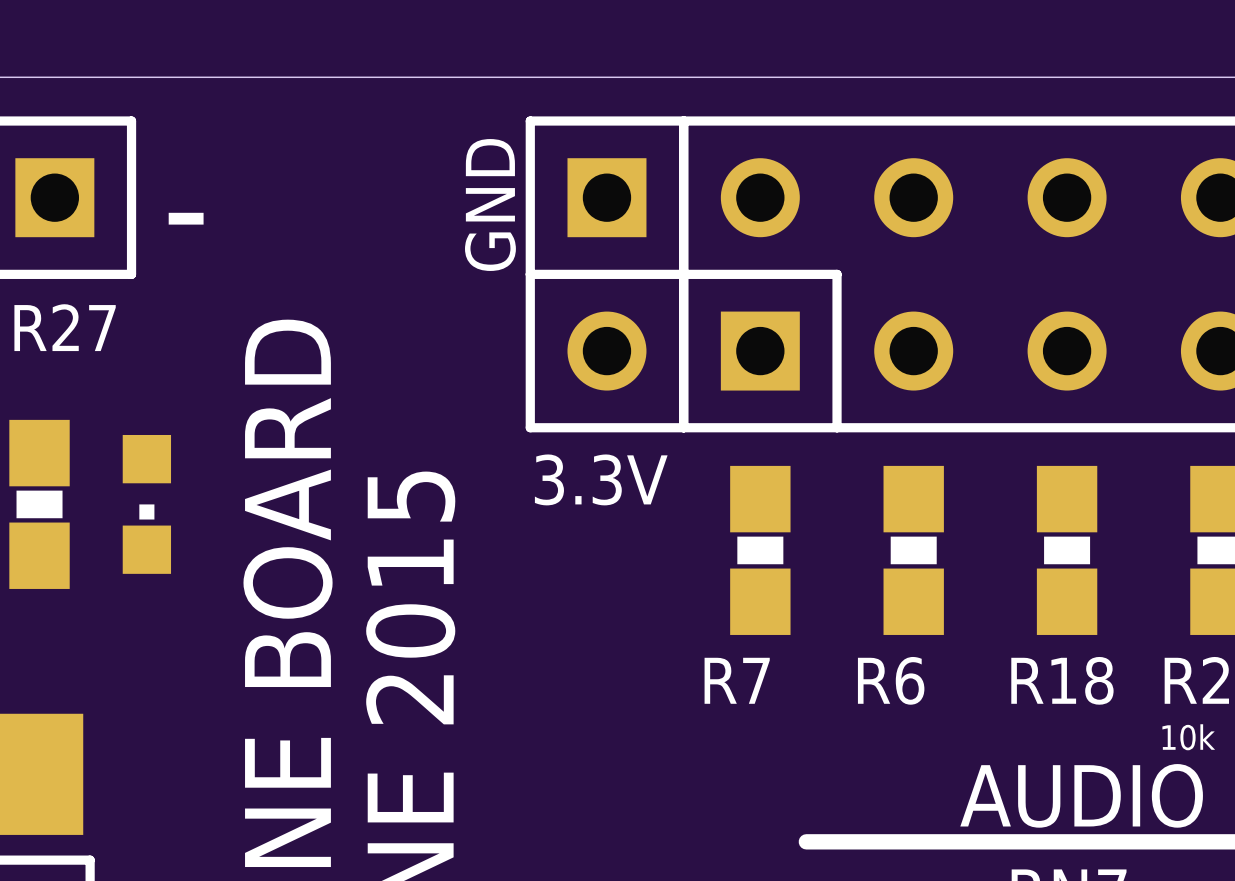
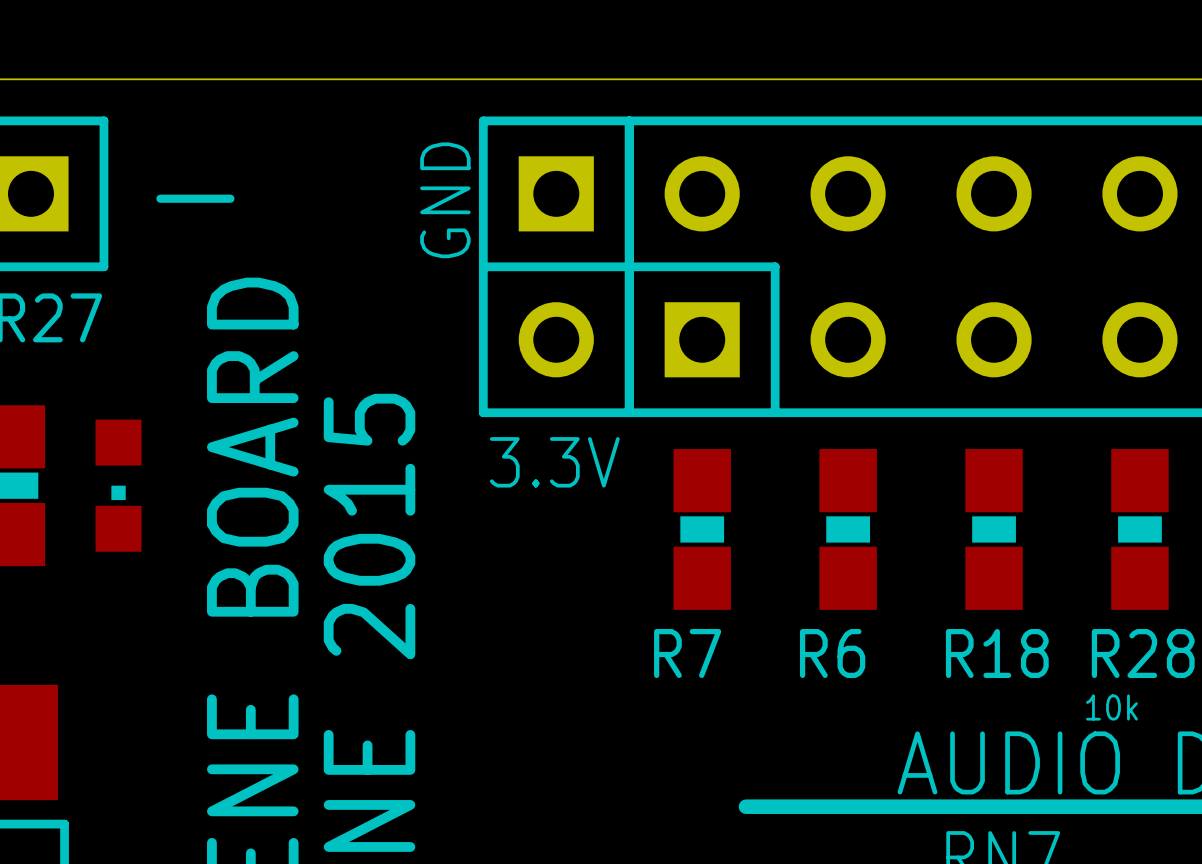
text position: - (186, 218) -> - (195, 198)

